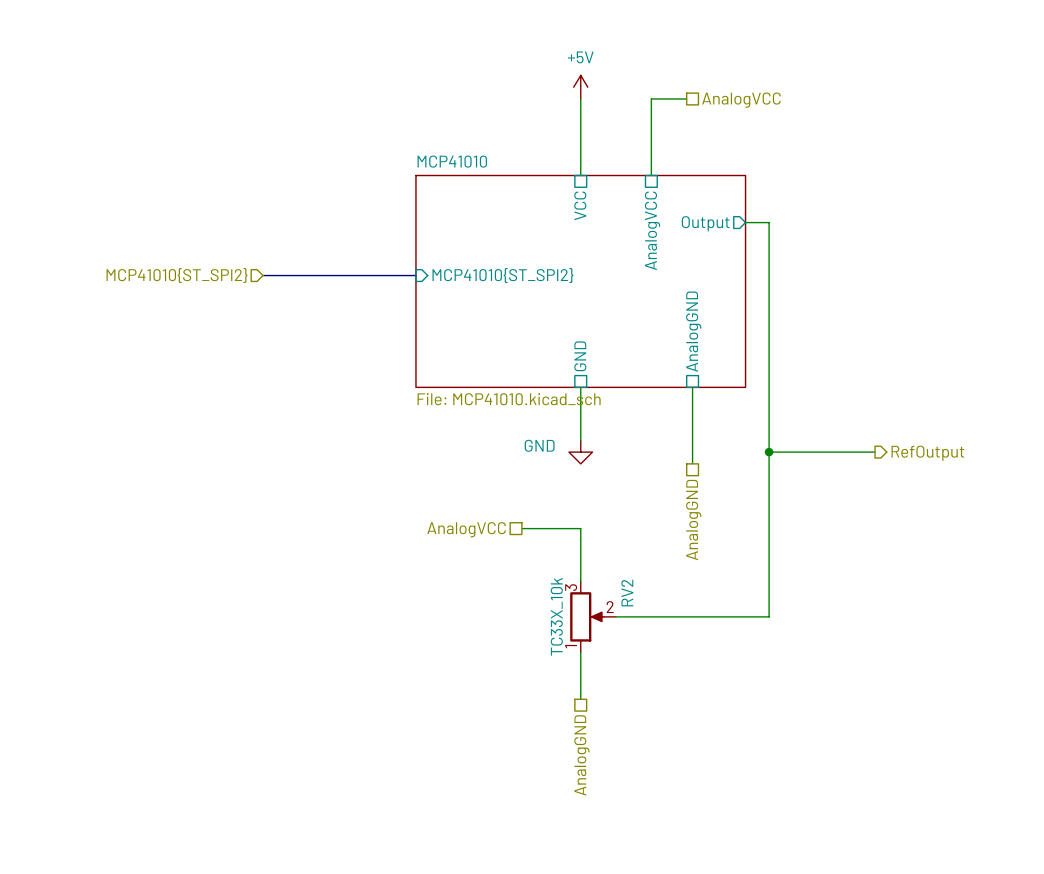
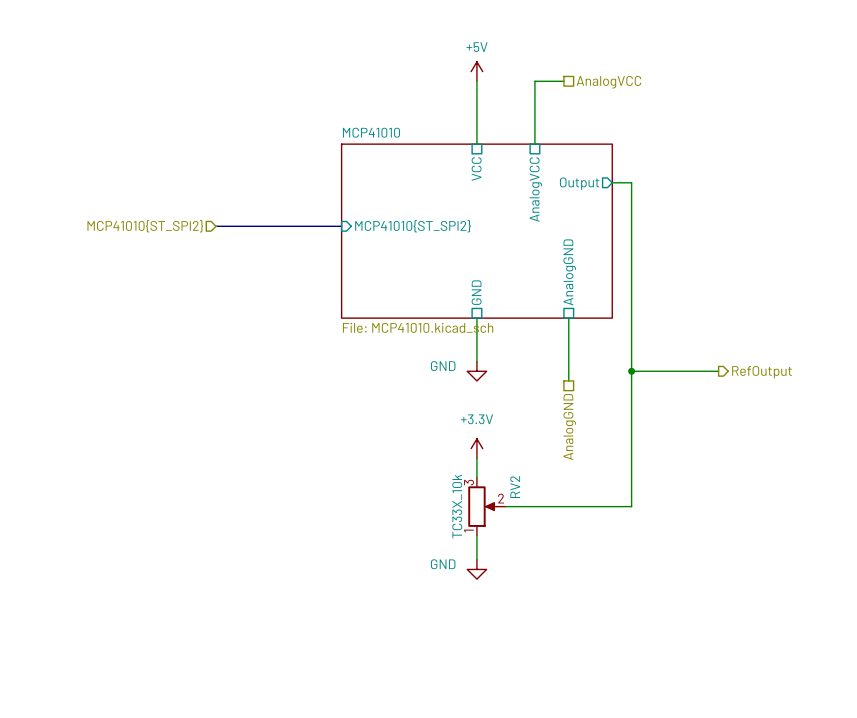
wire: (521, 528) (580, 528) (580, 558) -> none
hierarchical label: AnalogVCC (466, 529) -> none
power symbol: none -> +3.3V (476, 448)
power symbol: none -> GND (476, 569)
hierarchical label: AnalogGND (581, 755) -> none

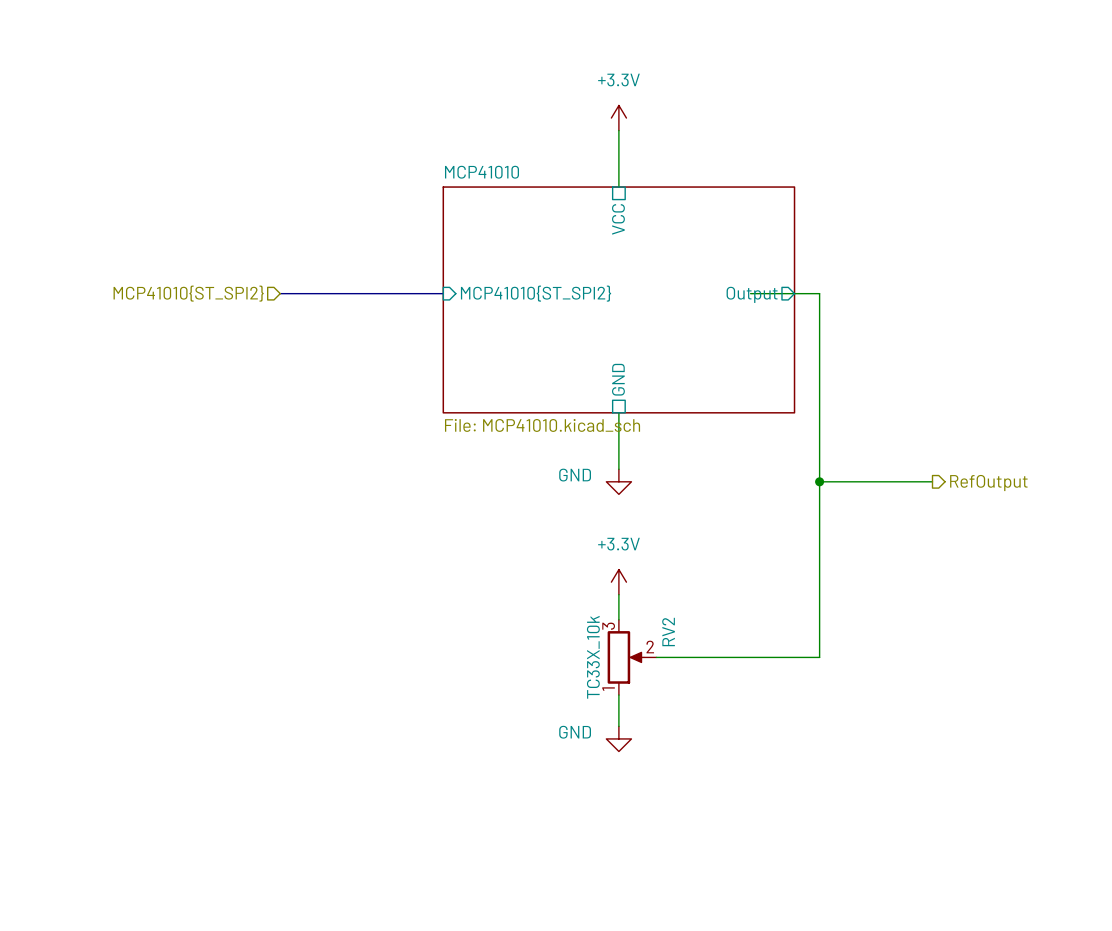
power symbol: +5V (476, 71) -> none
wire: (563, 81) (534, 81) (534, 144) -> none
hierarchical label: AnalogVCC (608, 82) -> none
power symbol: none -> +3.3V (618, 118)
wire: (612, 182) (631, 182) (631, 226) -> (750, 293) (819, 293)
sheet pin position: Output (579, 183) -> Output (752, 294)
sheet pin: AnalogVCC (535, 189) -> none
sheet pin: AnalogGND (569, 272) -> none
wire: (568, 318) (568, 380) -> none
hierarchical label: AnalogGND (569, 427) -> none

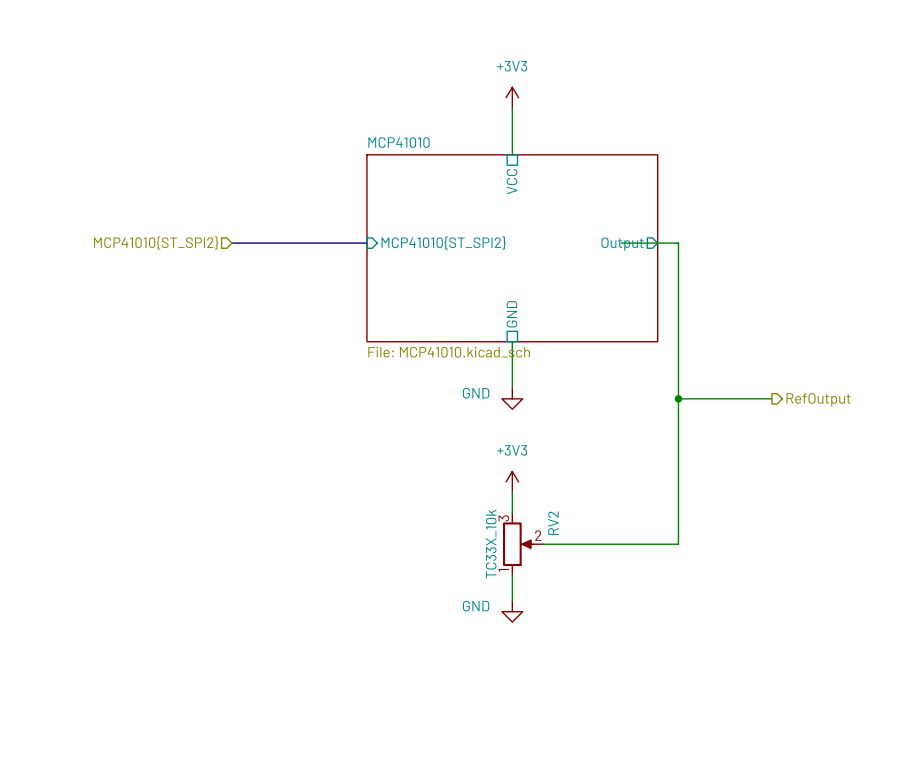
power symbol: +3.3V (618, 118) -> +3V3 (512, 97)
power symbol: +3.3V (618, 582) -> +3V3 (512, 481)

